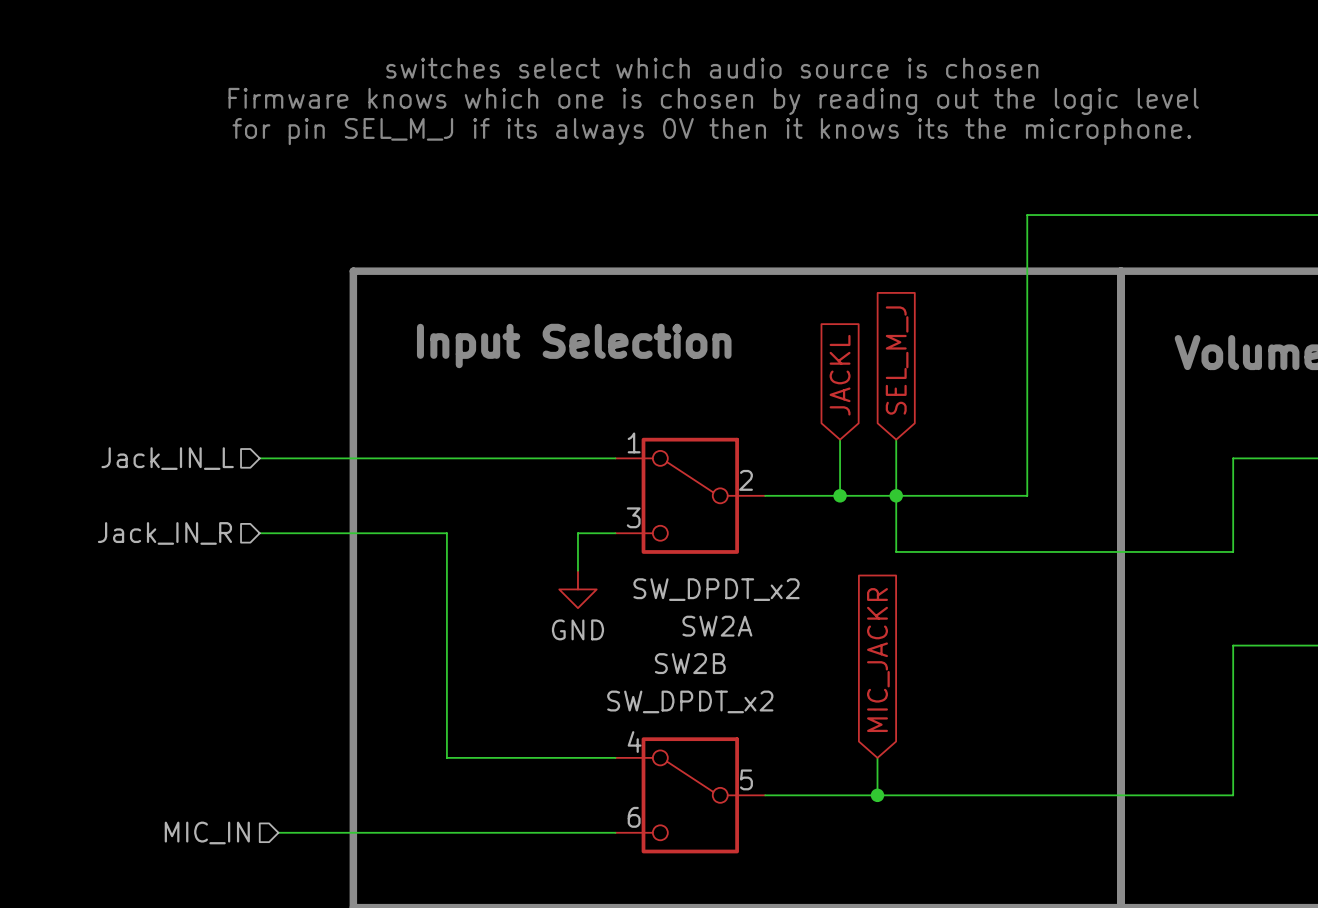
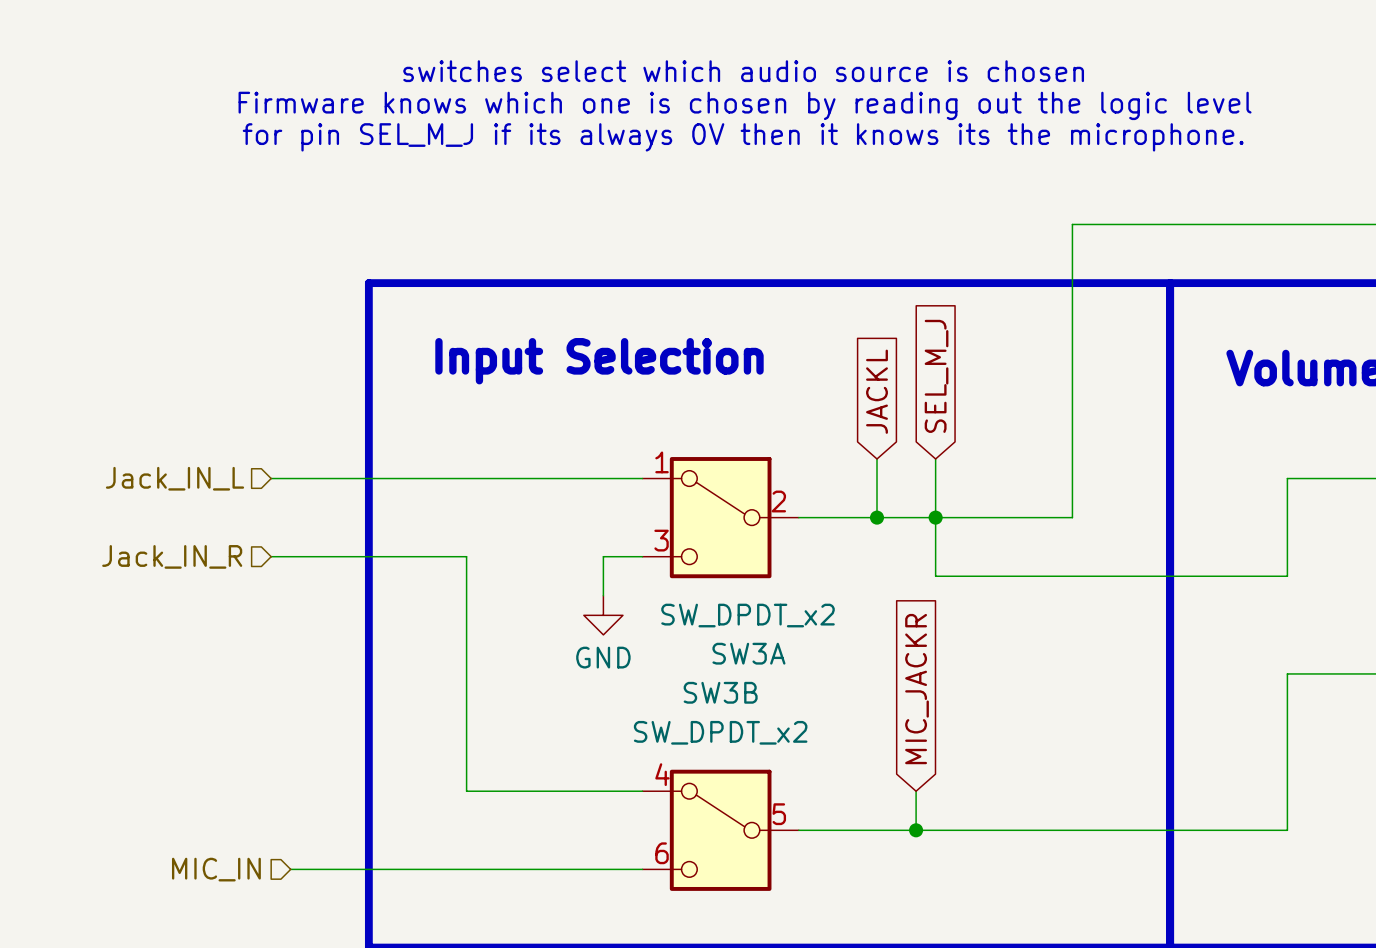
SW2A name: SW2A (717, 626) -> SW3A (748, 653)
SW2B name: SW2B (690, 663) -> SW3B (720, 692)

